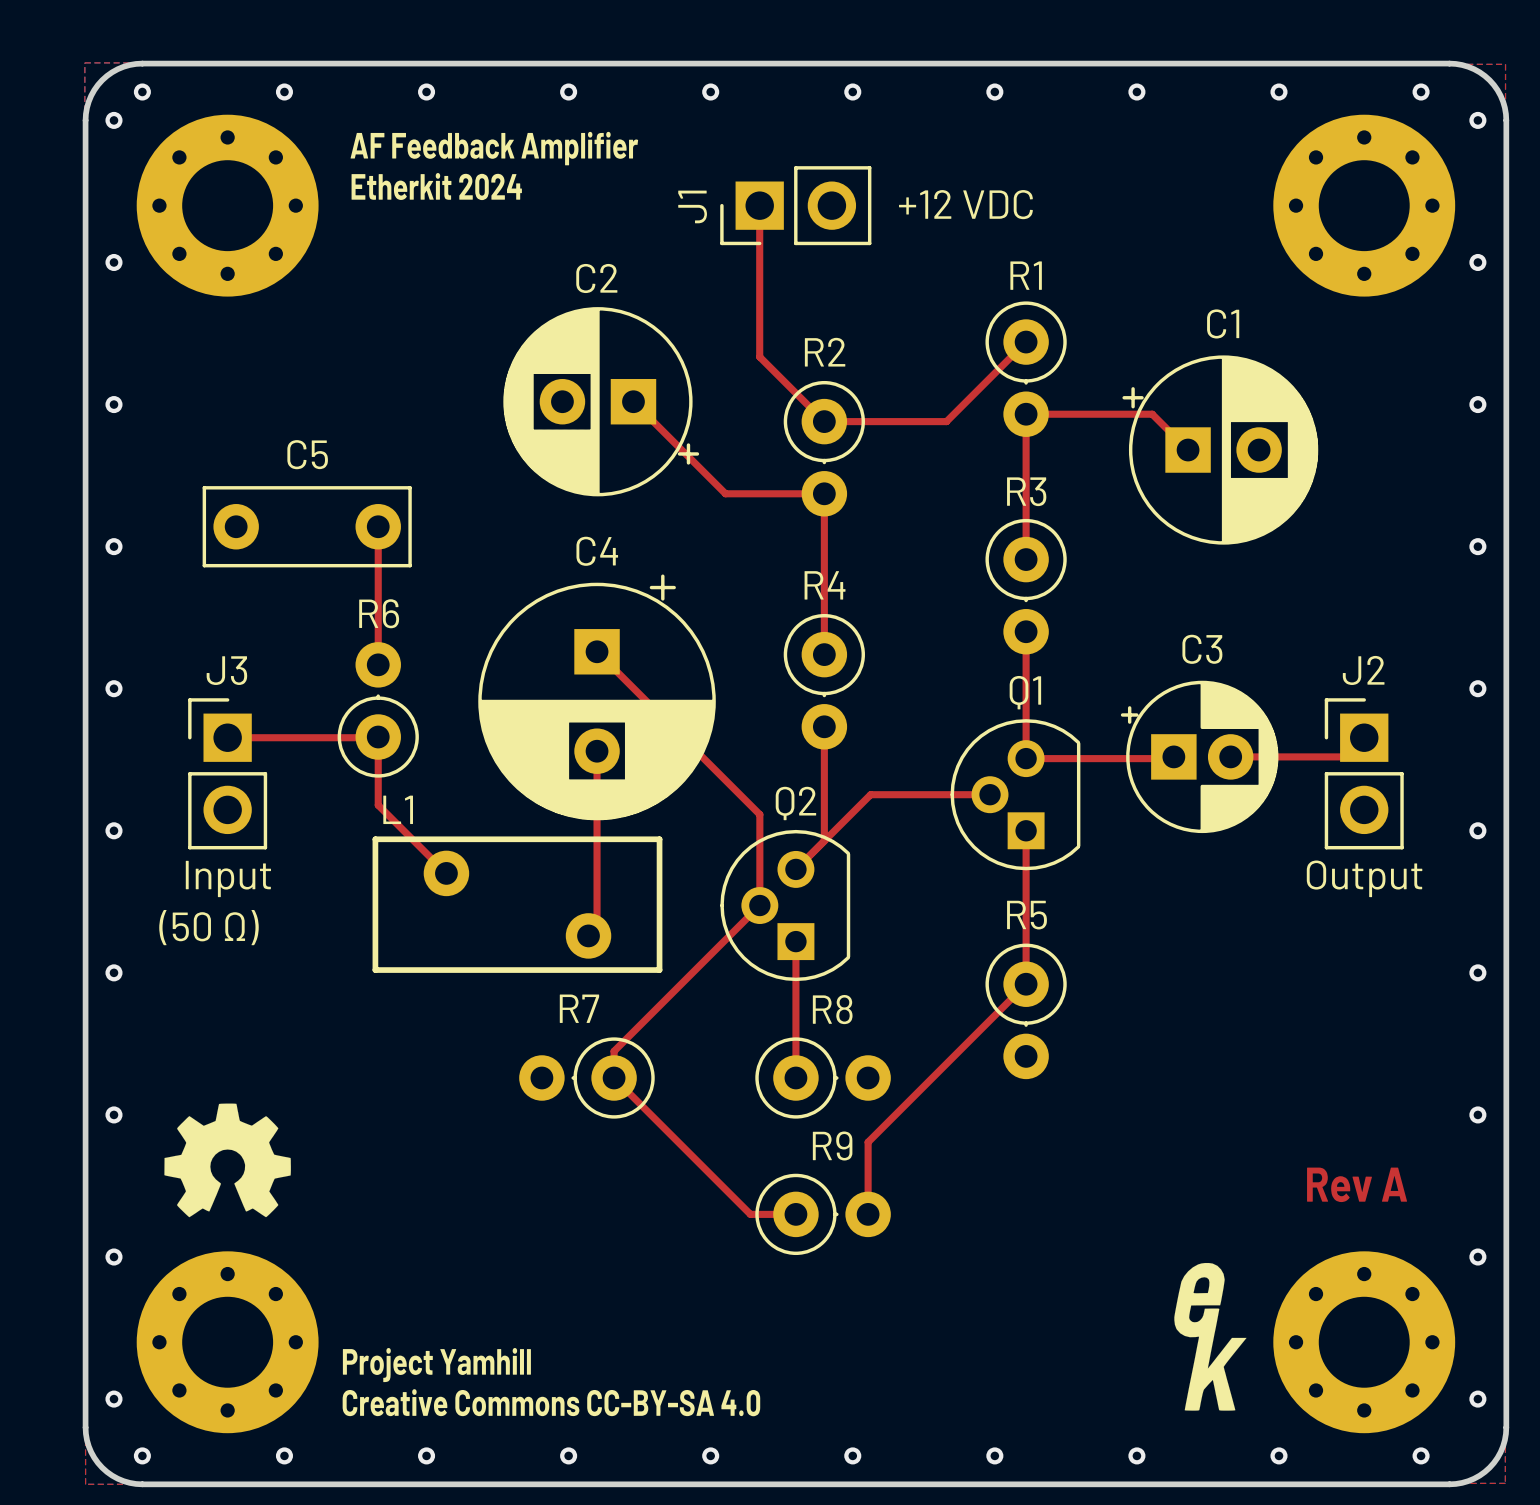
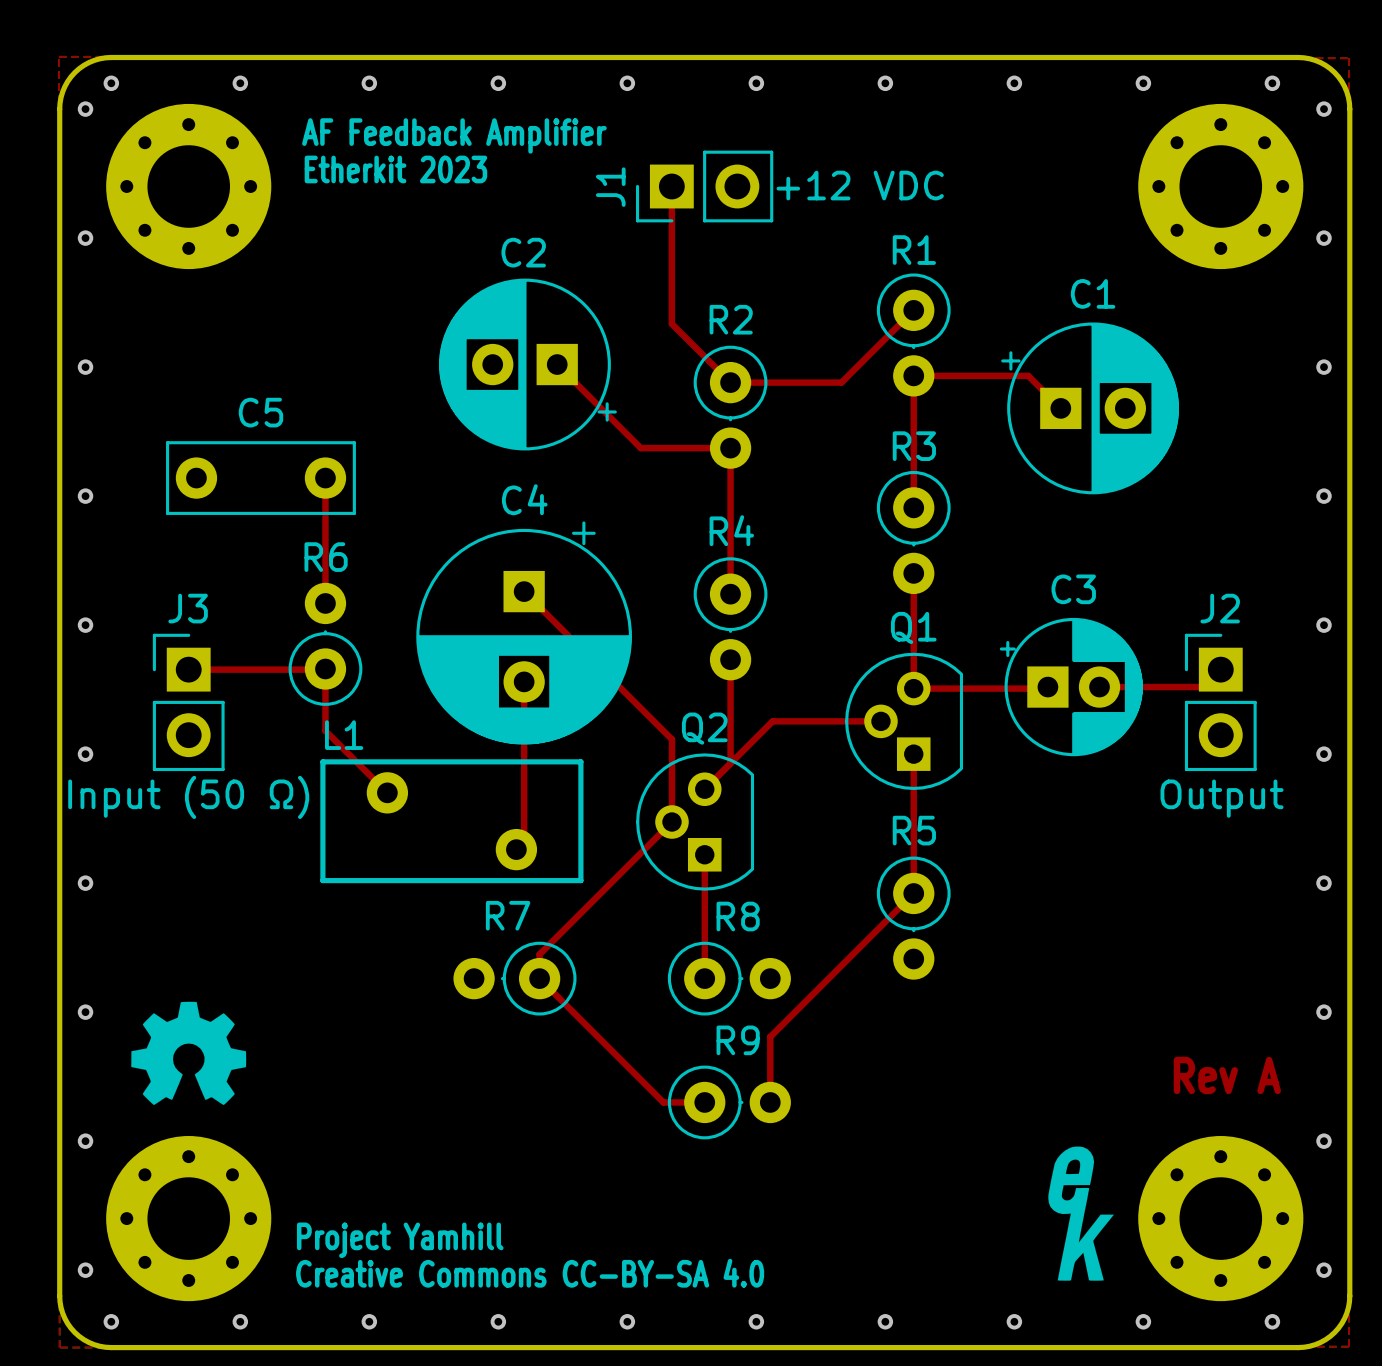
text: Etherkit 2024 (436, 186) -> Etherkit 2023 (395, 169)
J3 value: Input (228, 878) -> Input (50 Ω) (188, 797)
text: (50 Ω) (208, 927) -> none

